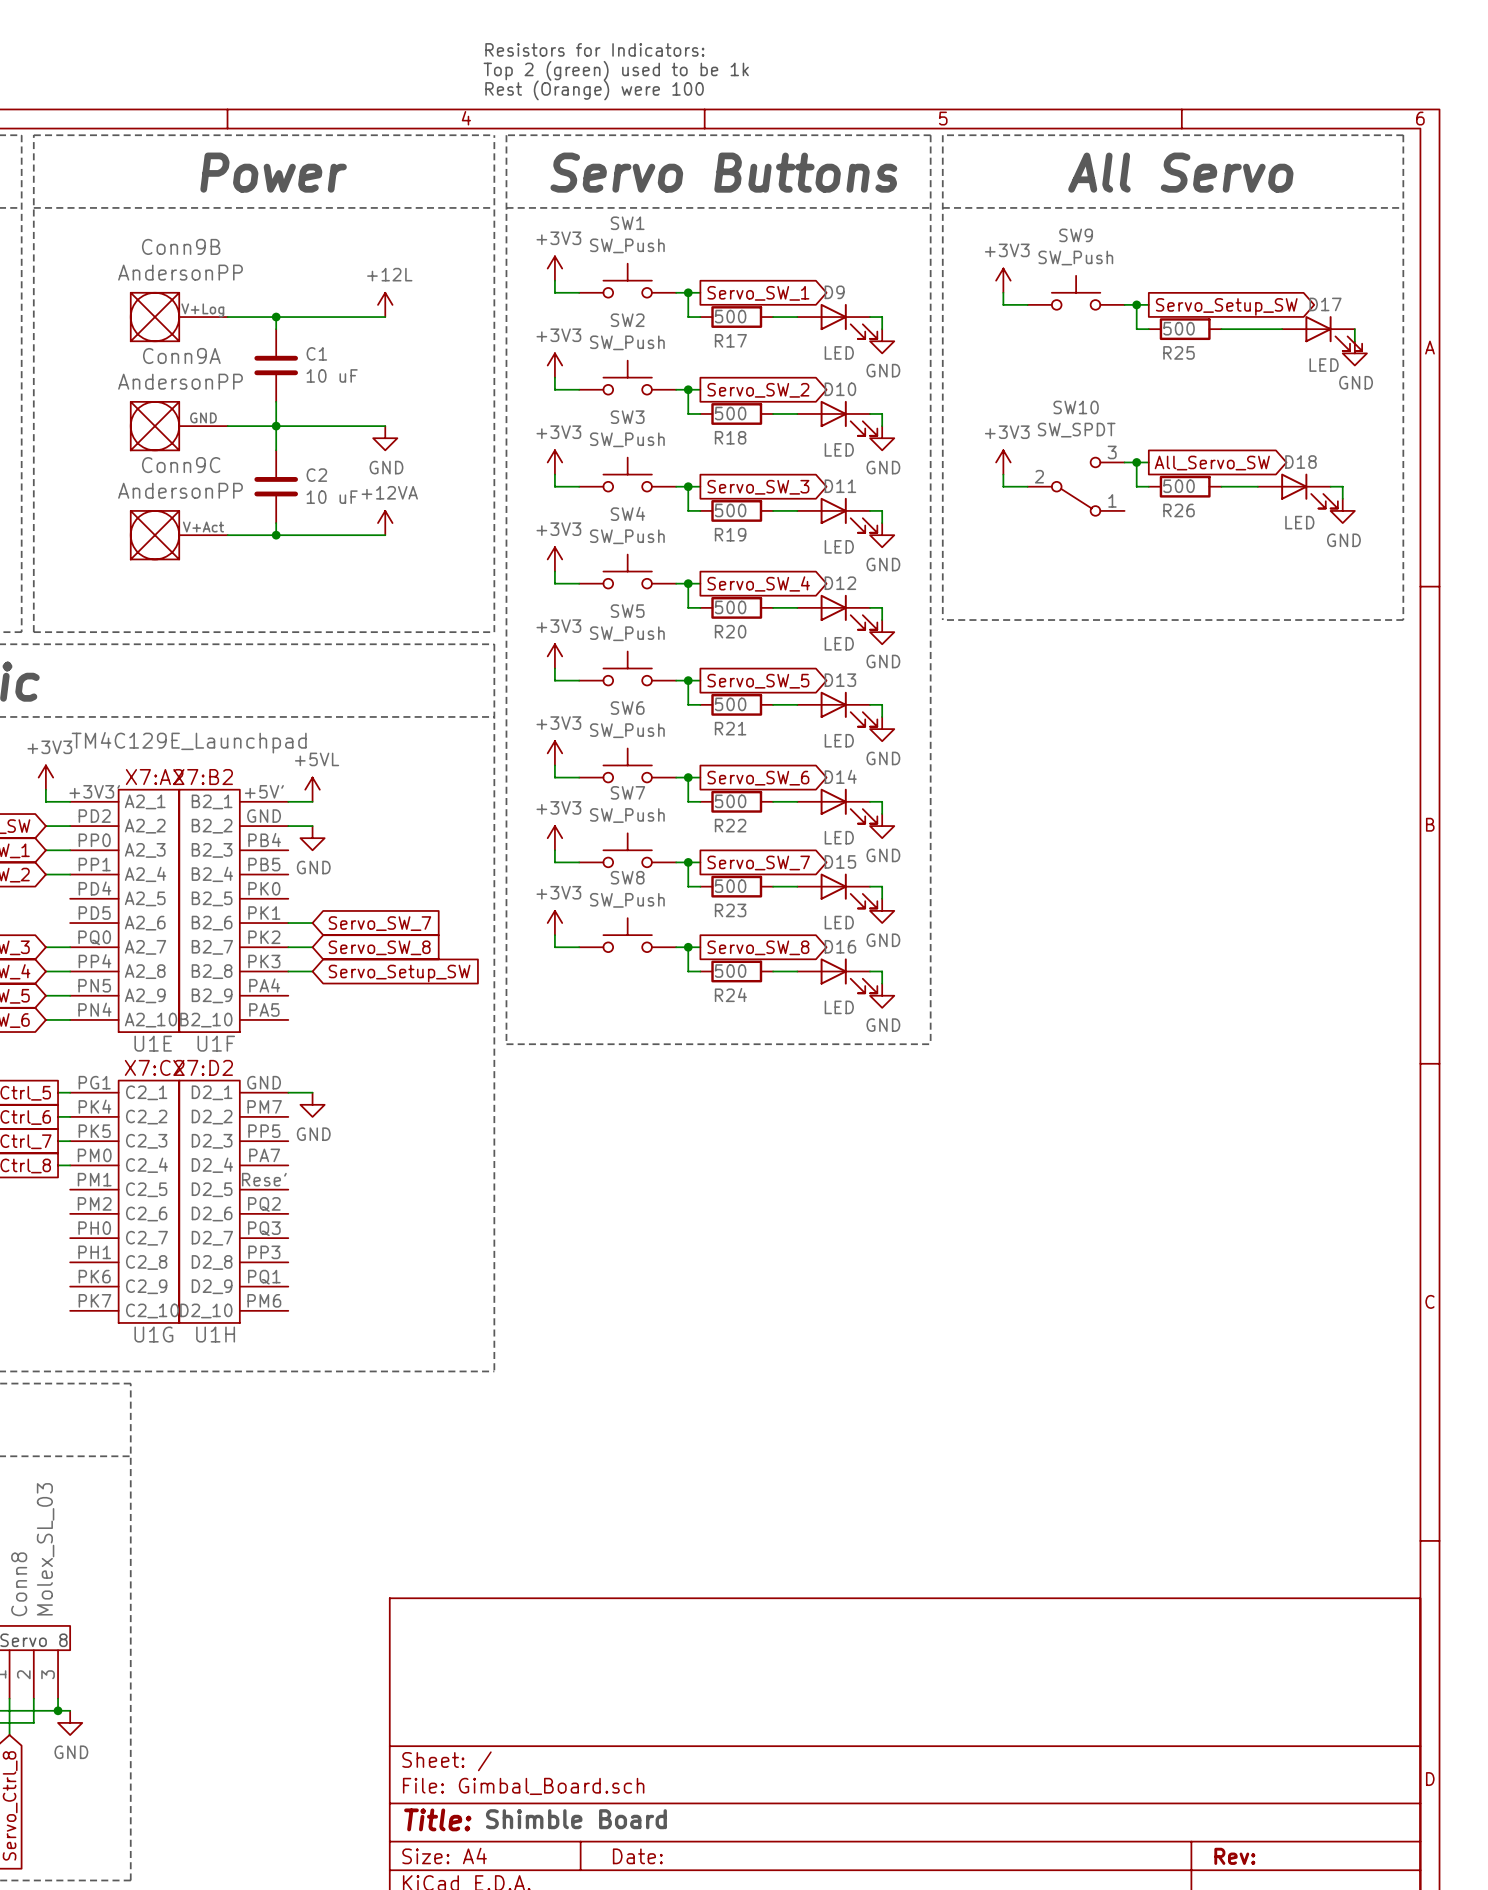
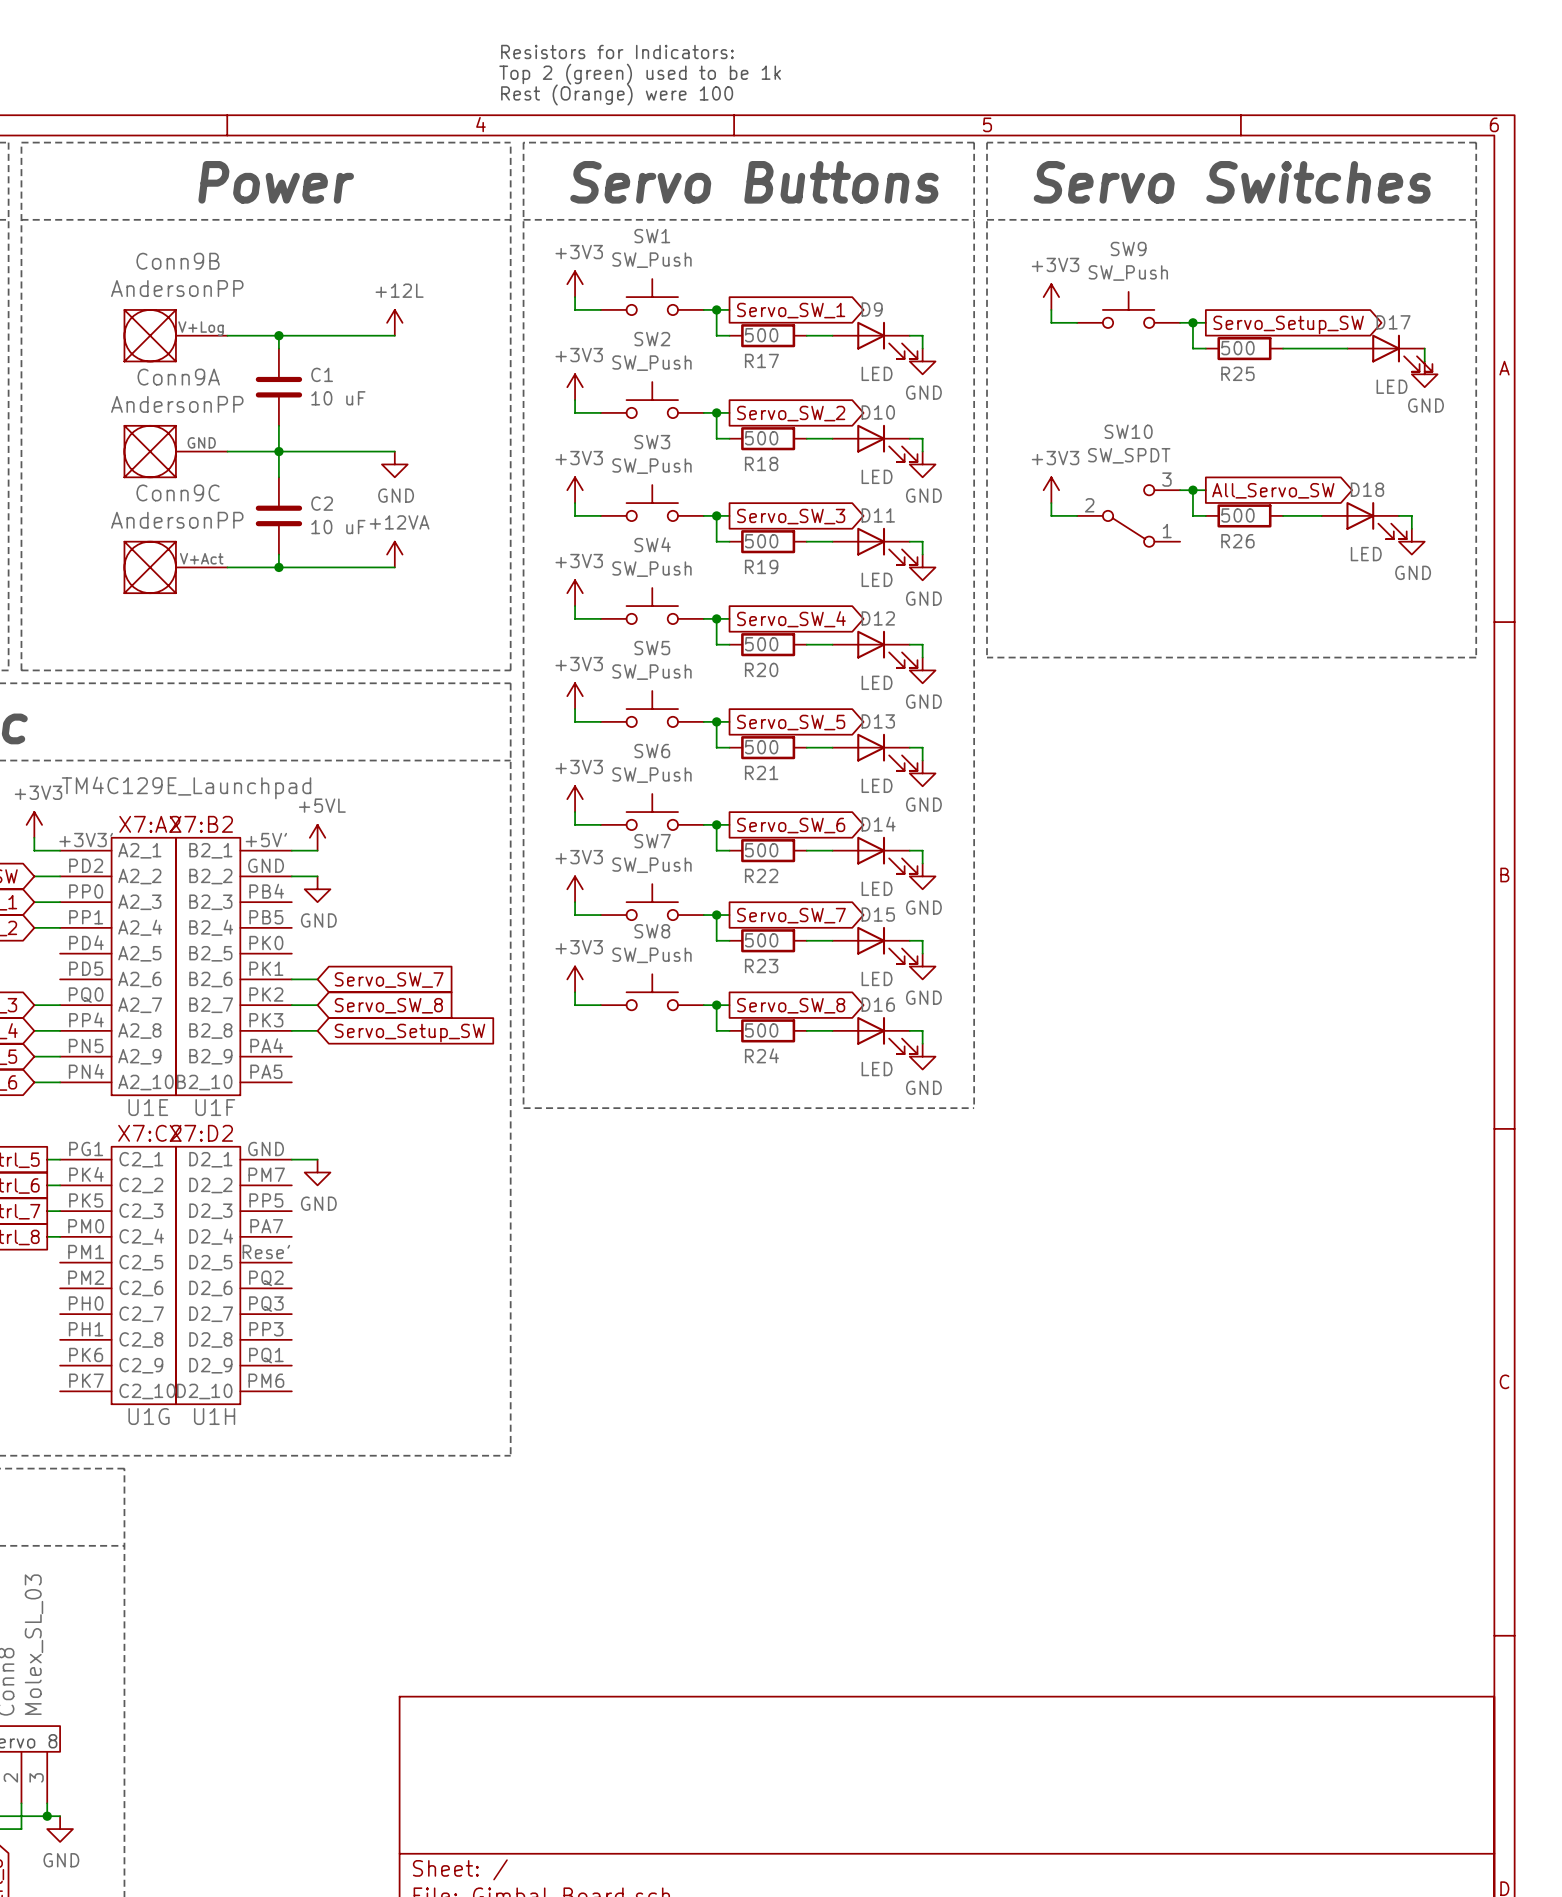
text: none -> Servo Switches (1232, 182)
text: All Servo (1180, 172) -> none

